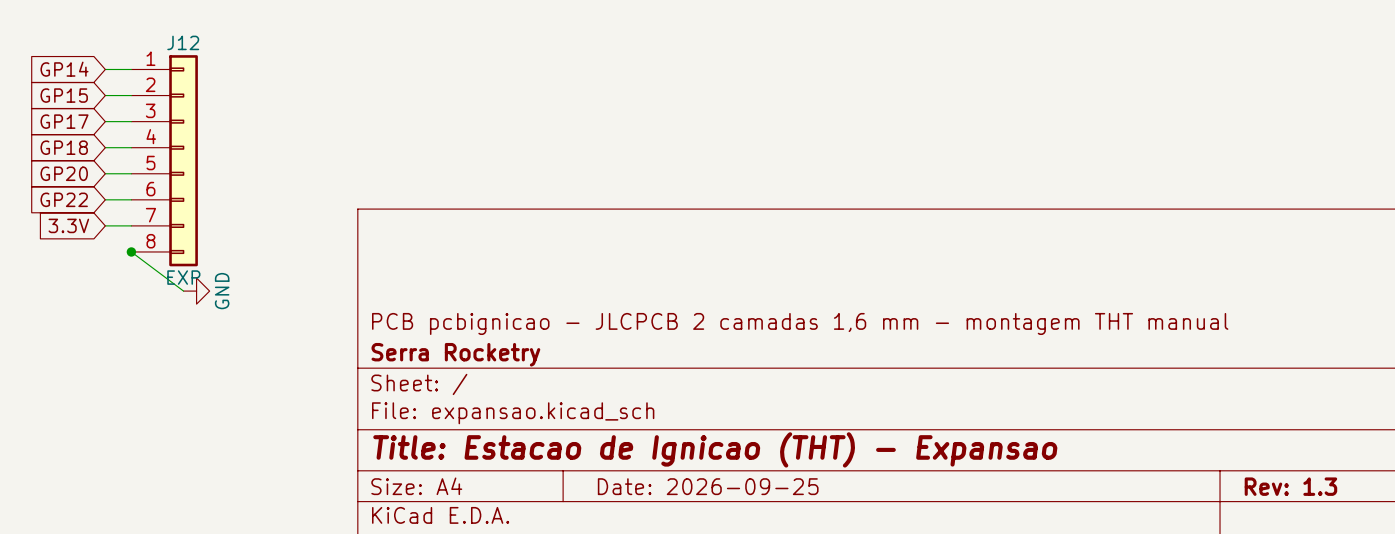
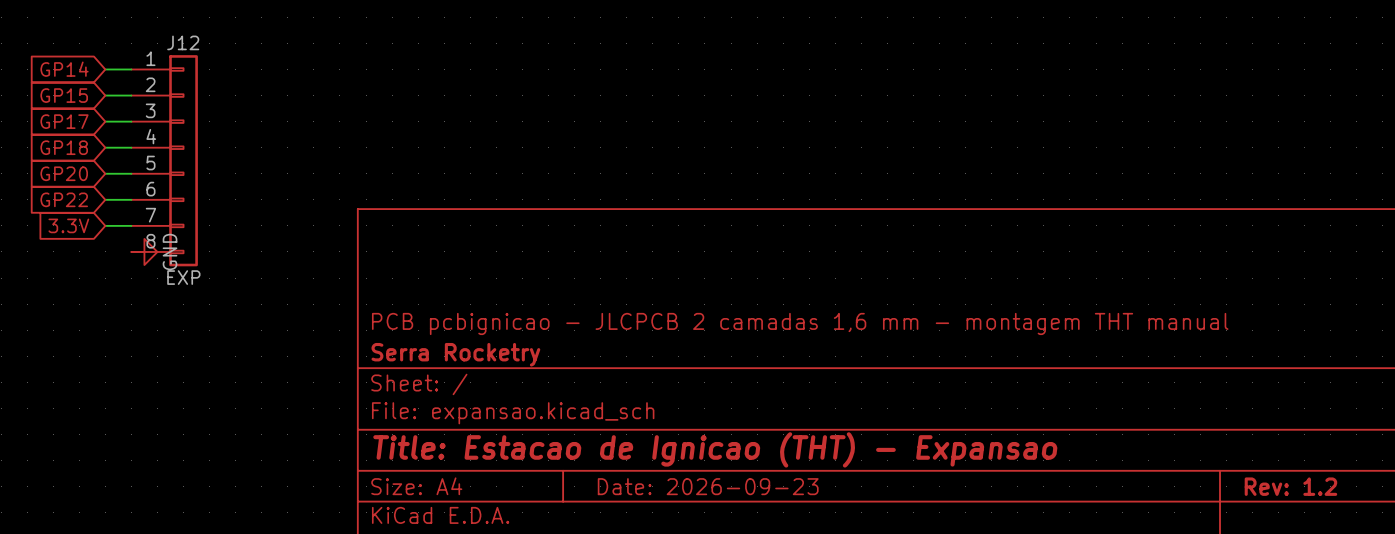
wire: (131, 251) (183, 291) -> none
junction: (131, 251) -> none
power symbol position: GND (196, 291) -> GND (144, 251)
title block: Date: 2026-09-25 (708, 486) -> Date: 2026-09-23 (708, 486)
title block: Rev: 1.3 (1290, 486) -> Rev: 1.2 (1290, 486)

